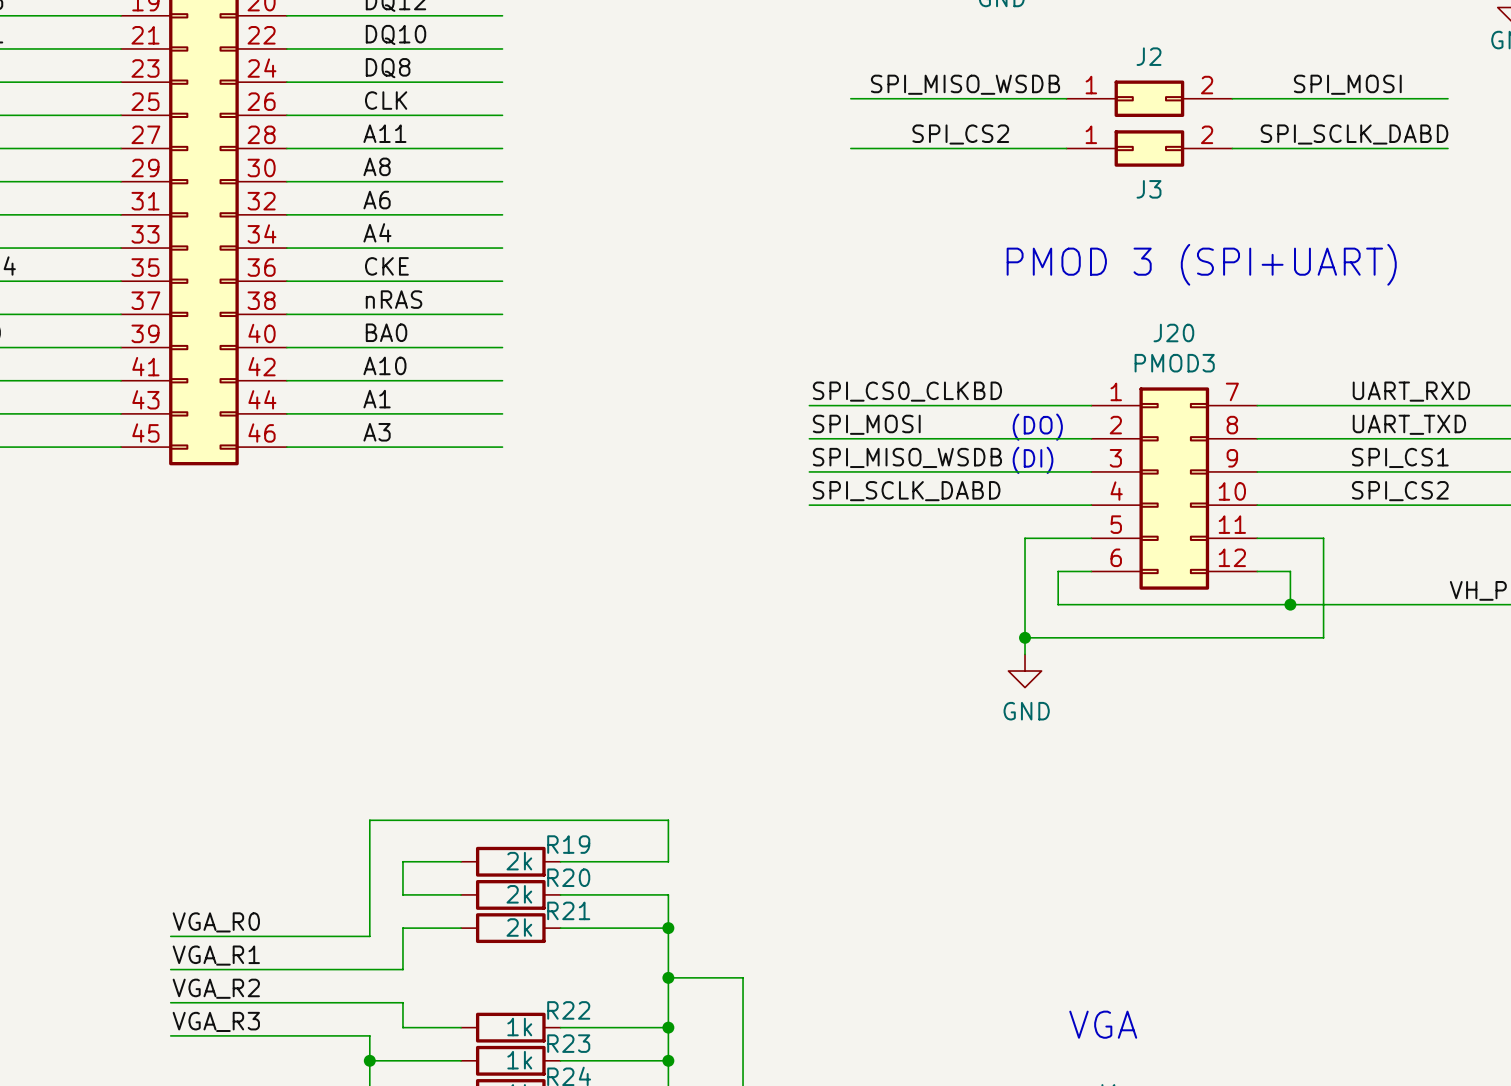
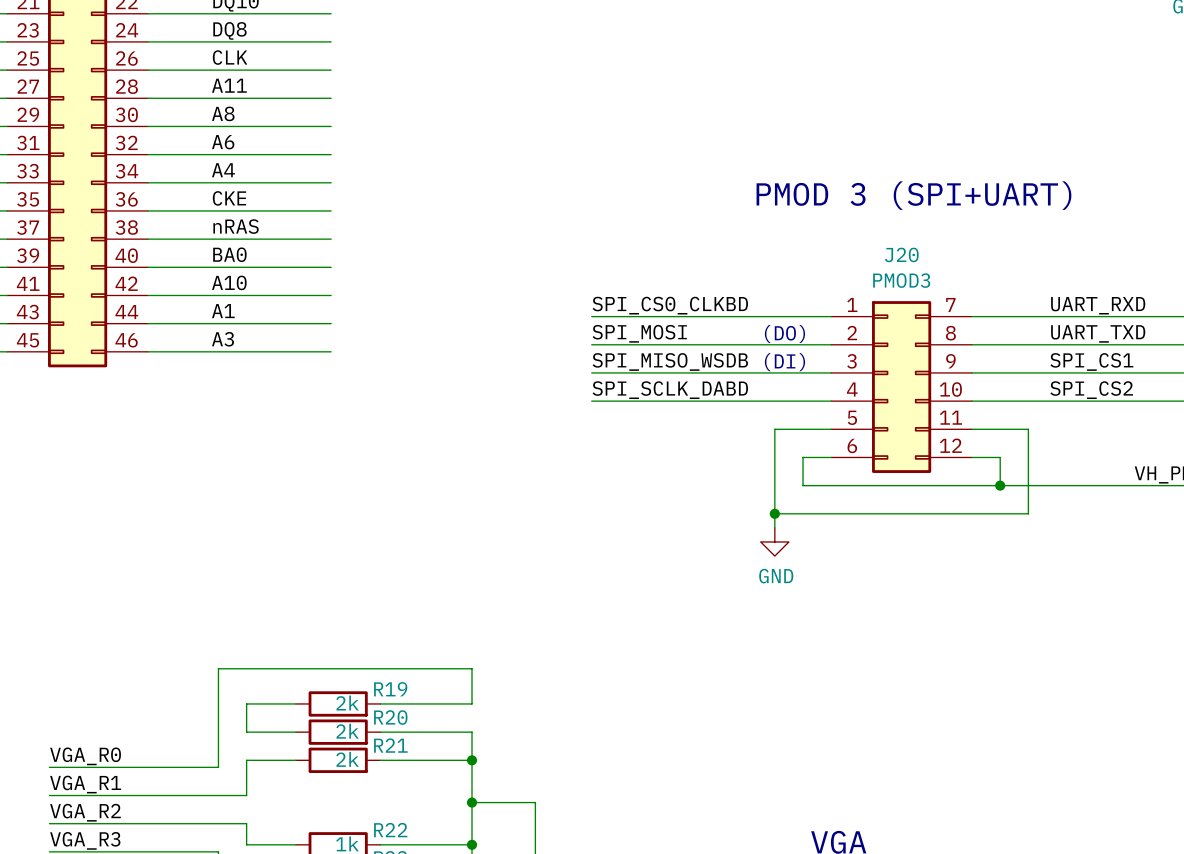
label: SPI_MISO_WSDB (965, 84) -> none
label: SPI_MOSI (1347, 84) -> none
wire: (850, 98) (1066, 98) -> none
J2: (1149, 98) -> none
wire: (1232, 98) (1447, 98) -> none
label: SPI_CS2 (960, 134) -> none
label: SPI_SCLK_DABD (1354, 134) -> none
wire: (850, 148) (1066, 148) -> none
J3: (1149, 148) -> none
wire: (1232, 148) (1447, 148) -> none

